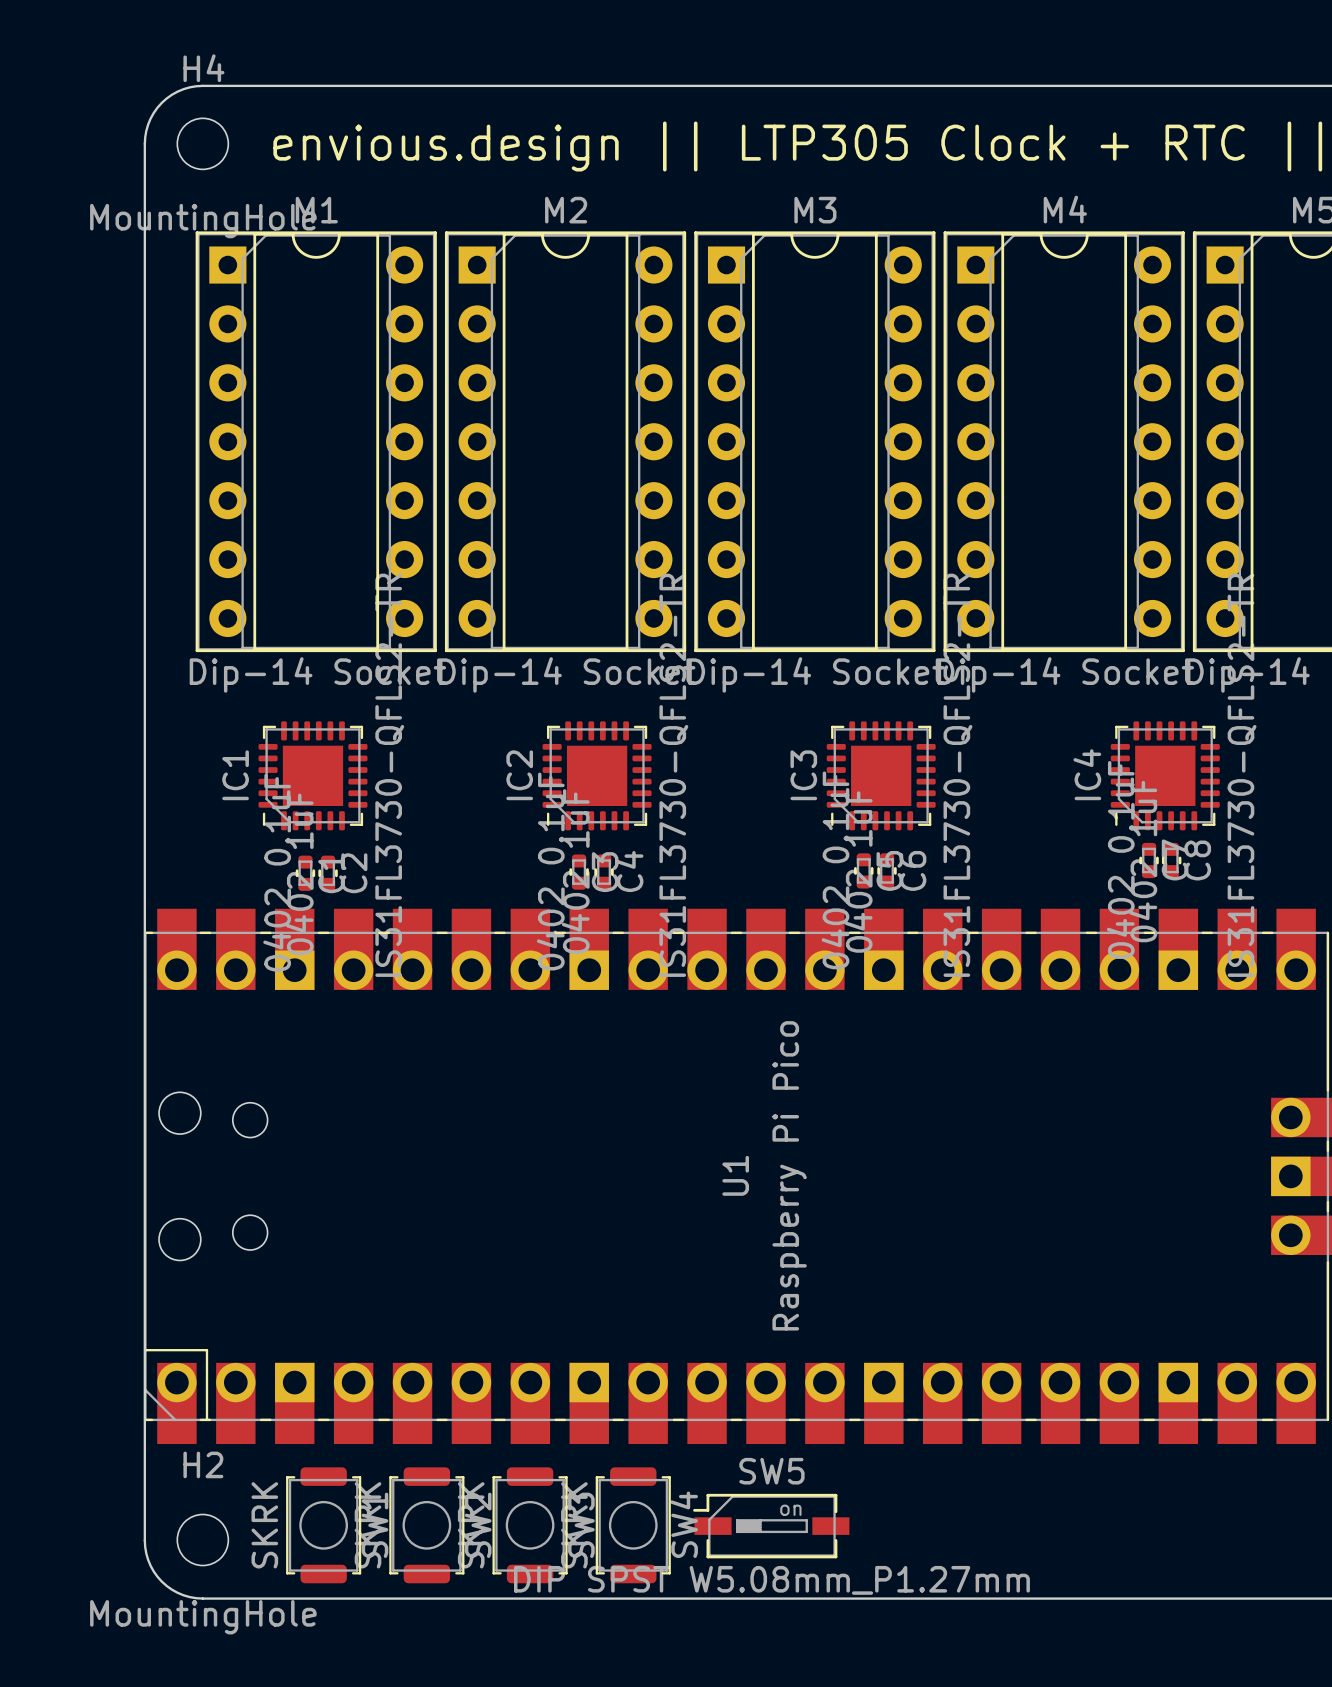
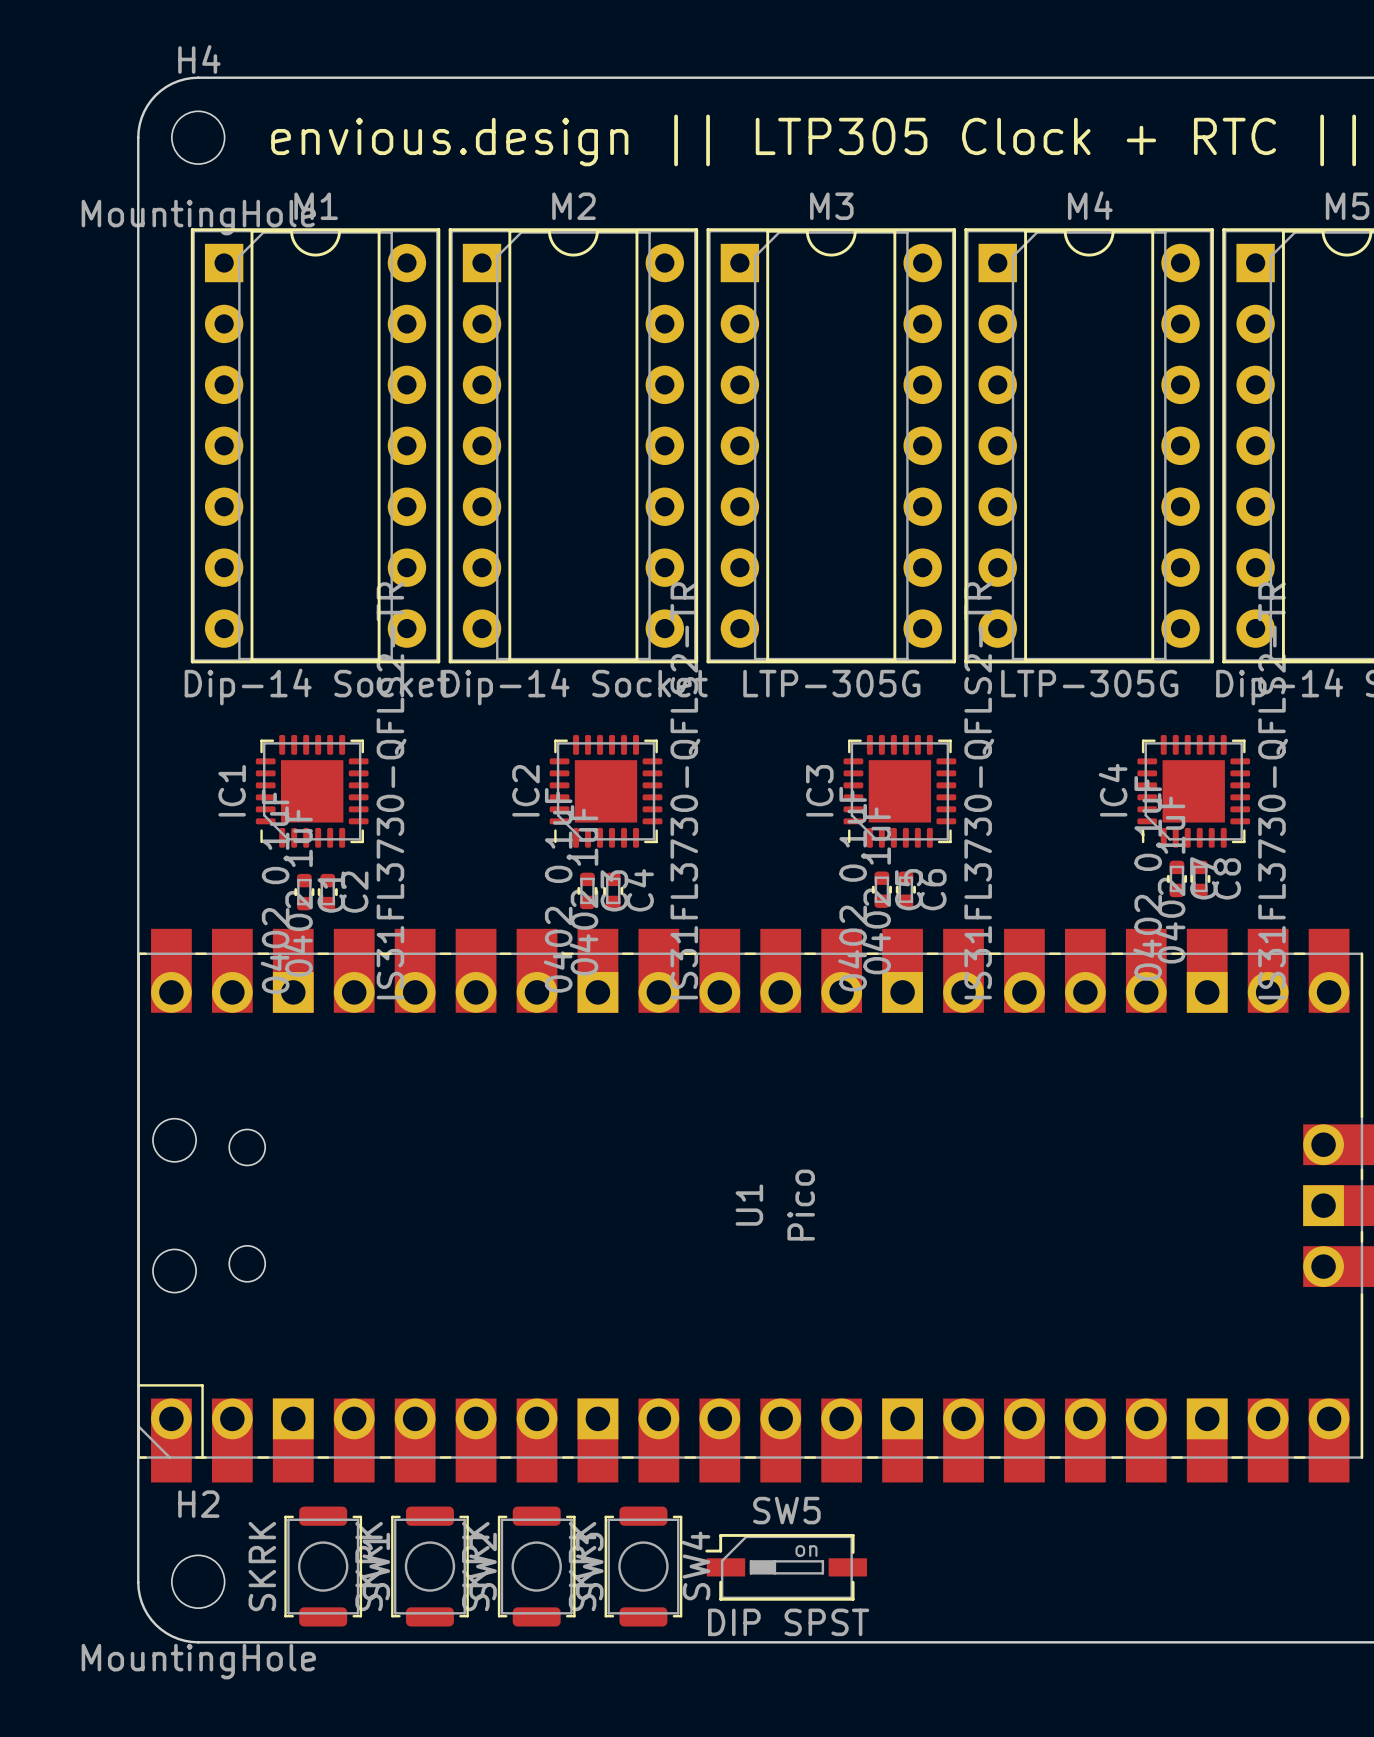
M3 value: Dip-14 Socket (816, 674) -> LTP-305G (831, 683)
M4 value: Dip-14 Socket (1065, 674) -> LTP-305G (1089, 683)
U1 value: Raspberry Pi Pico (789, 1175) -> Pico (801, 1205)
SW5 value: DIP SPST W5.08mm_P1.27mm (771, 1580) -> DIP SPST (788, 1622)

